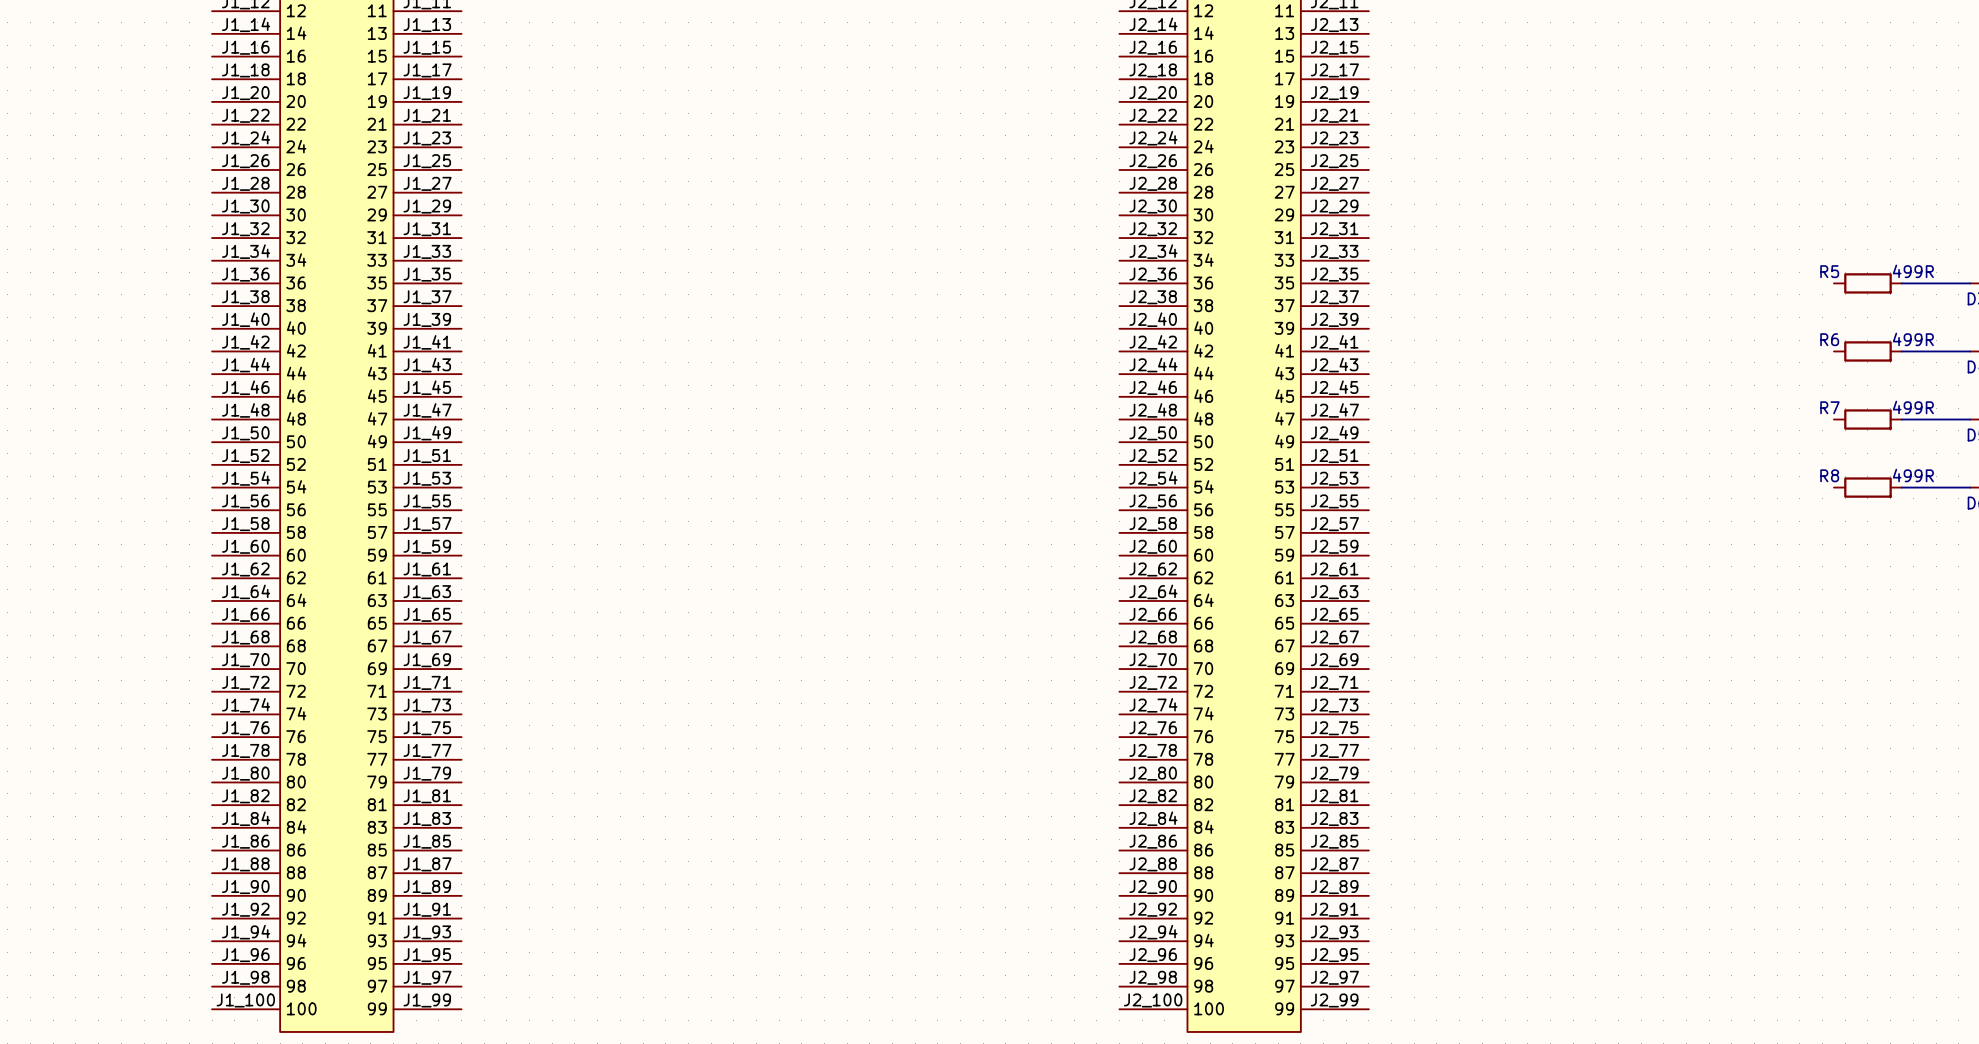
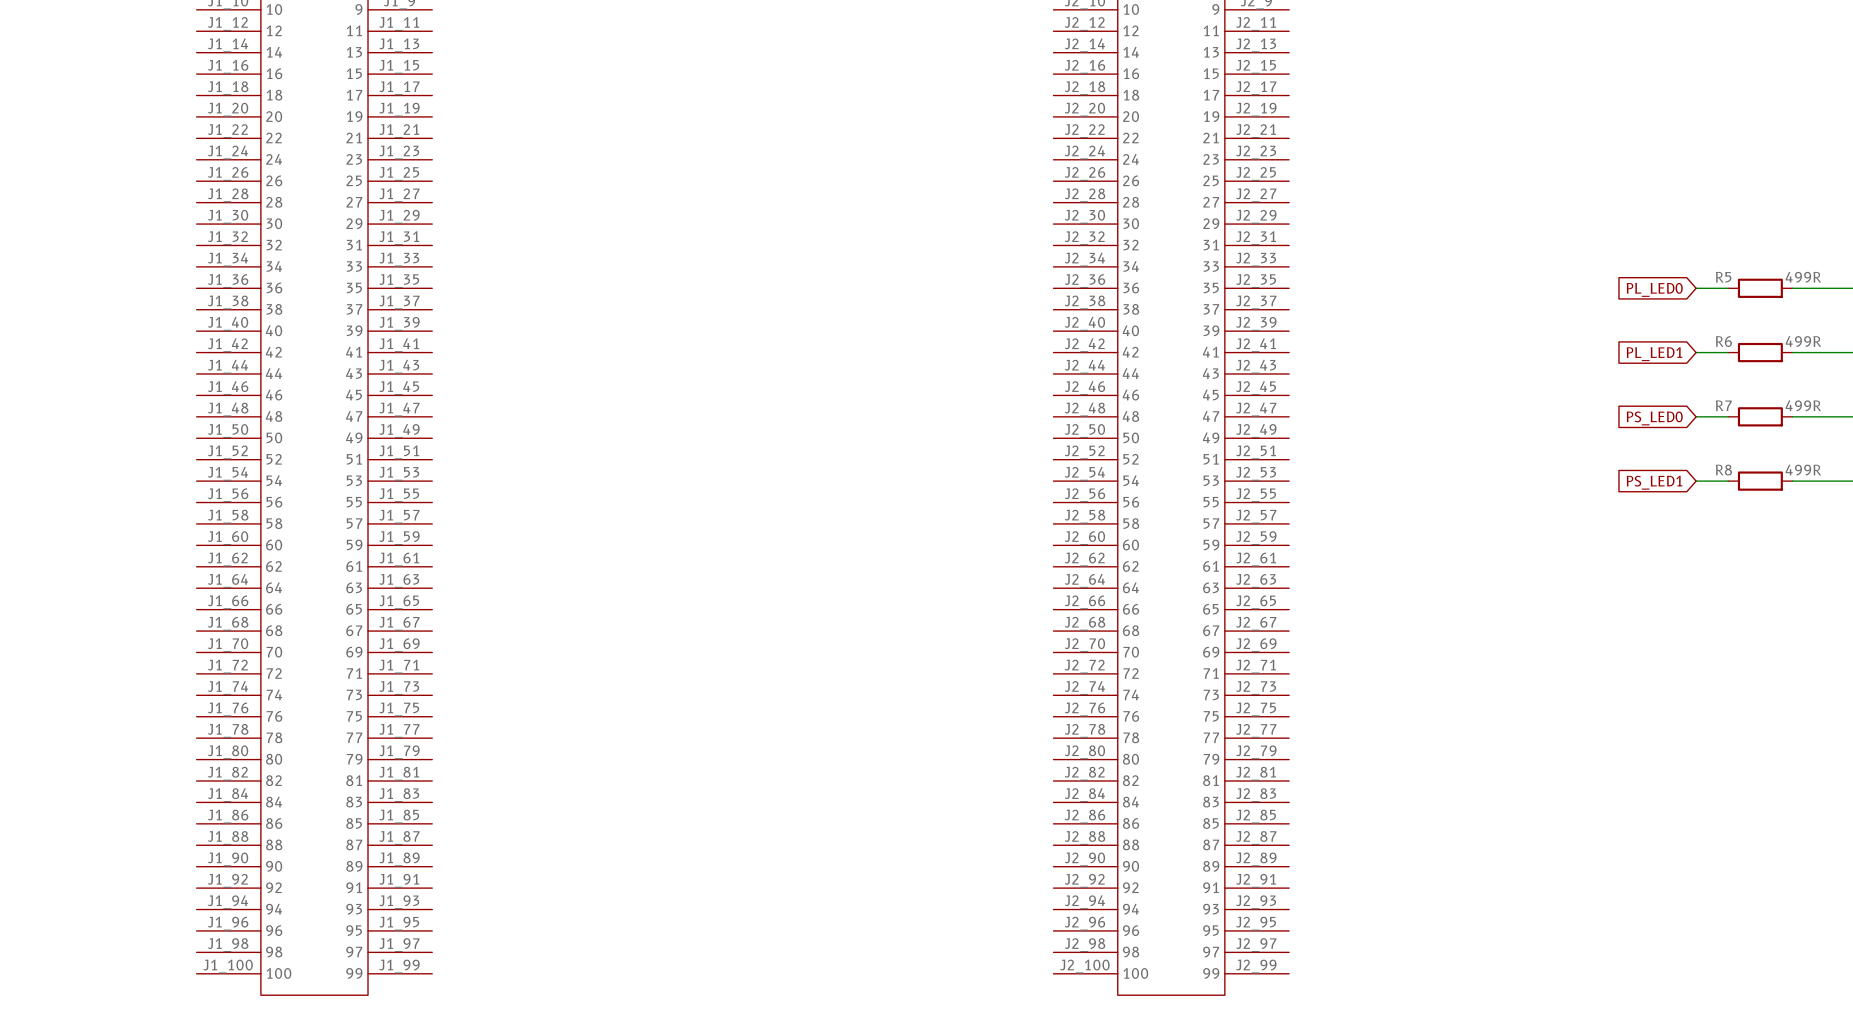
global label: none -> PL_LED0 (1654, 289)
wire: none -> (1696, 288) (1728, 288)
wire: none -> (1696, 352) (1728, 352)
global label: none -> PL_LED1 (1654, 354)
wire: none -> (1696, 416) (1728, 416)
global label: none -> PS_LED0 (1654, 418)
wire: none -> (1696, 481) (1728, 481)
global label: none -> PS_LED1 (1654, 482)

